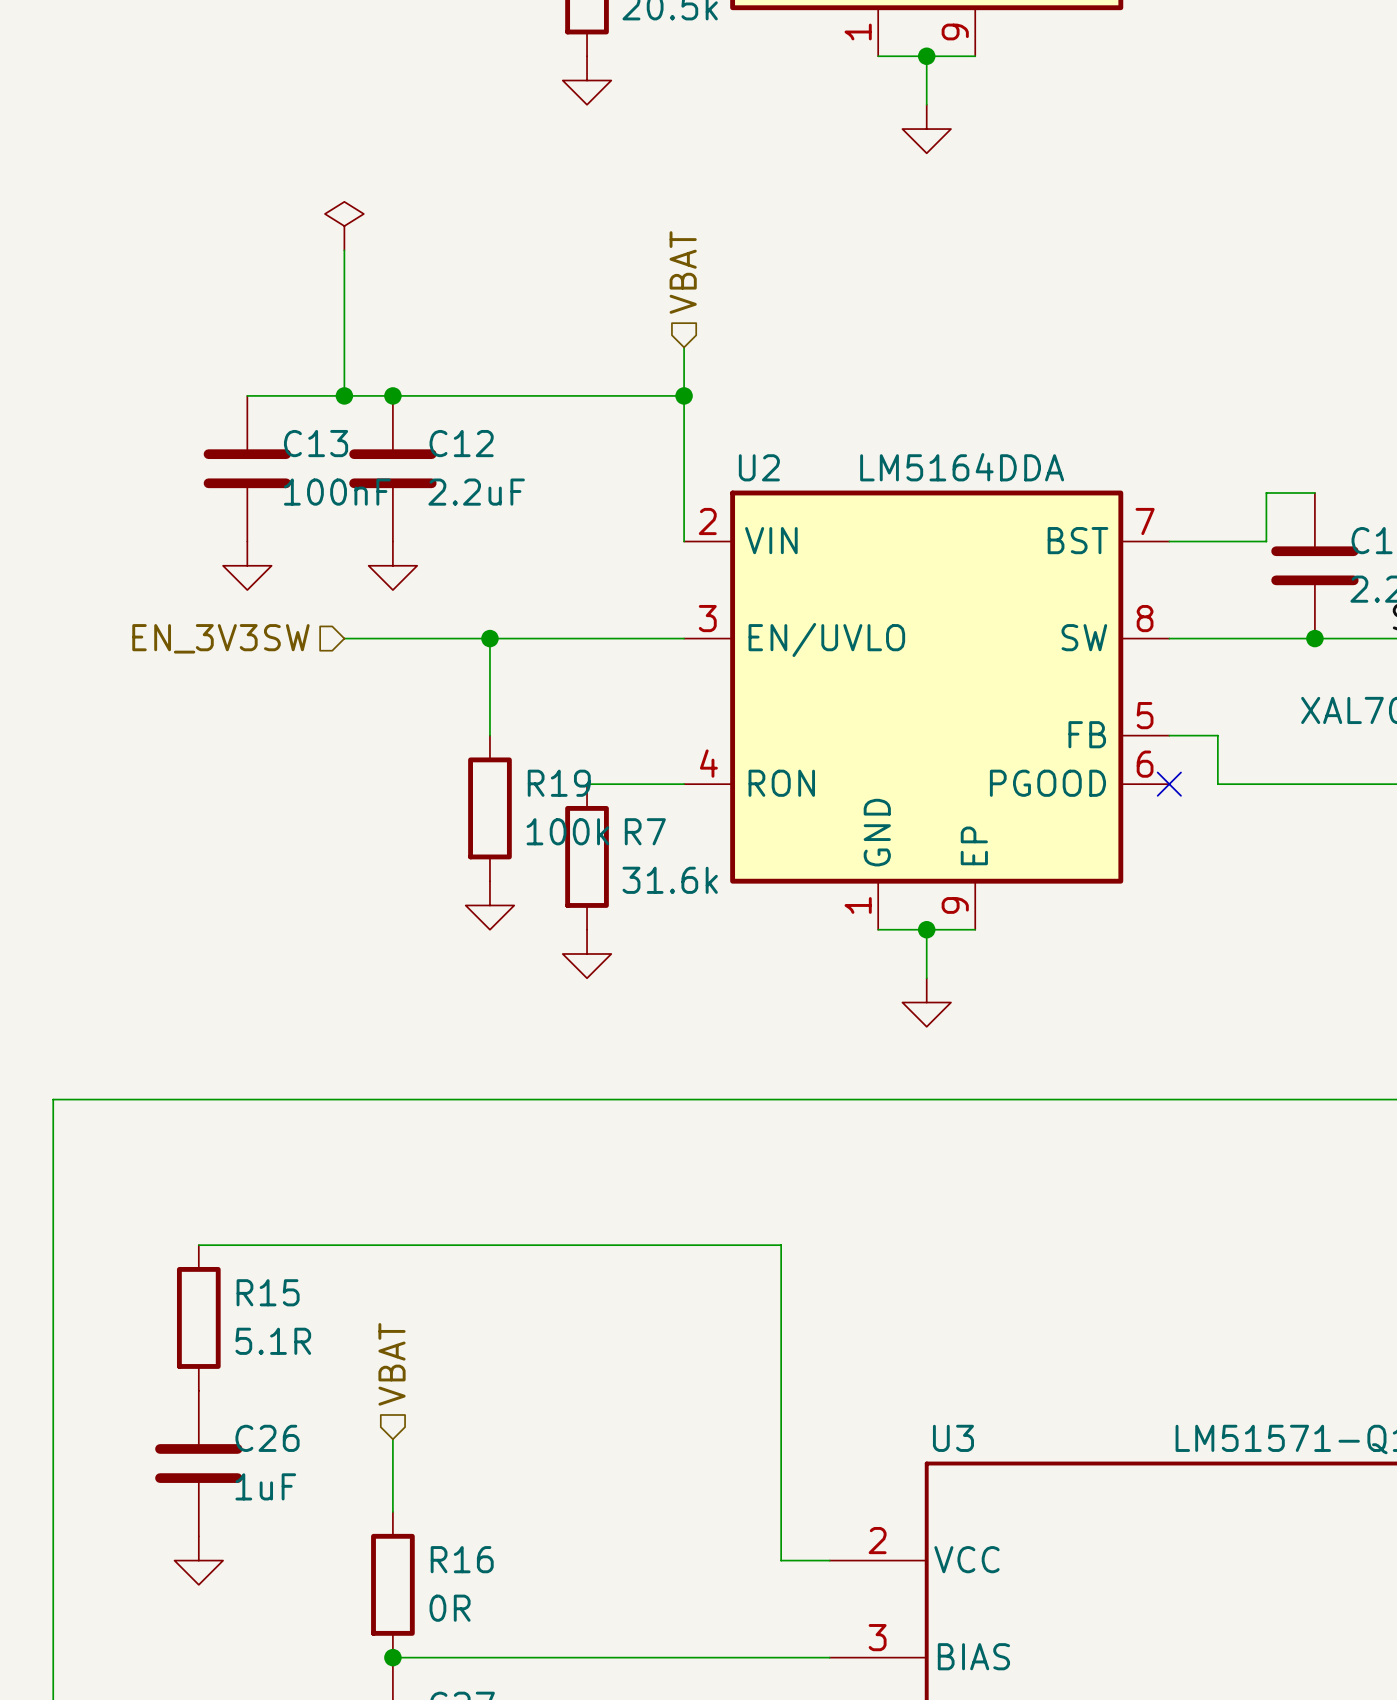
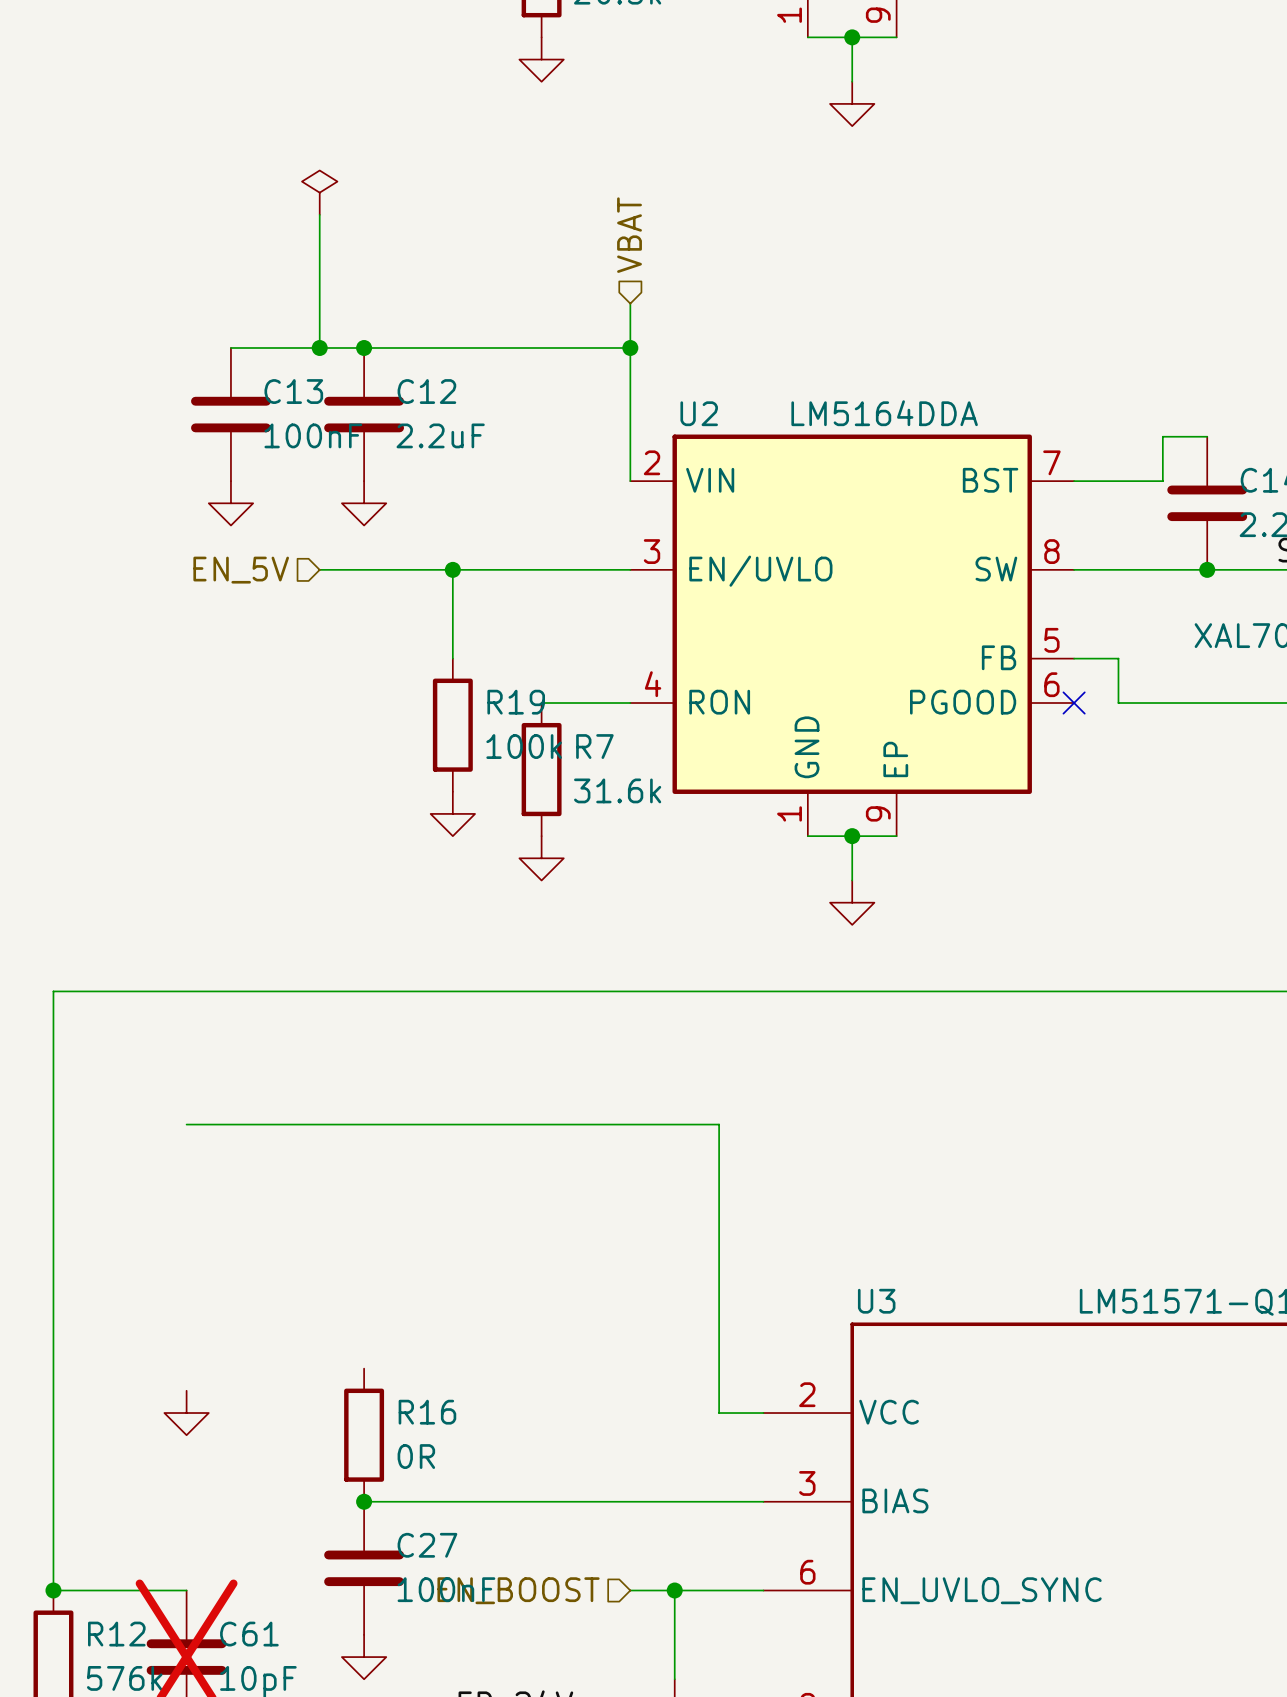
hierarchical label: EN_3V3SW (220, 638) -> EN_5V (241, 570)
R15: 5.1R (198, 1317) -> none
hierarchical label: VBAT (392, 1364) -> none
wire: (392, 1439) (392, 1512) -> none
C26: 1uF (198, 1463) -> none

